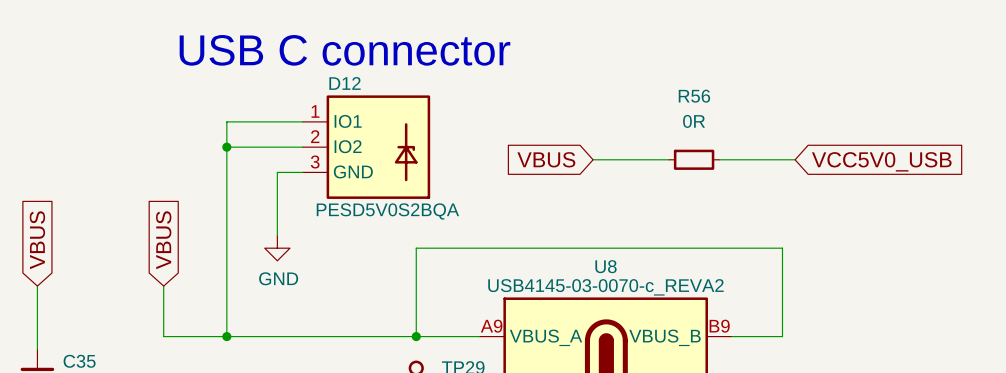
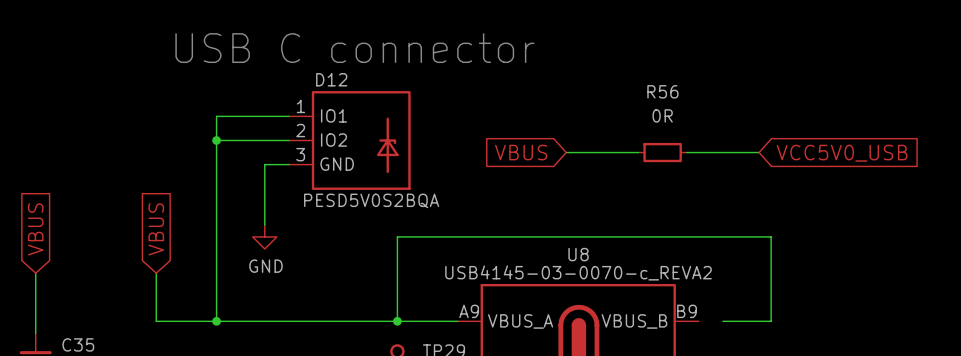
wire: (782, 248) (782, 336) -> (747, 236) (771, 236) (771, 321) (747, 321)
wire: (731, 336) (757, 336) -> none

